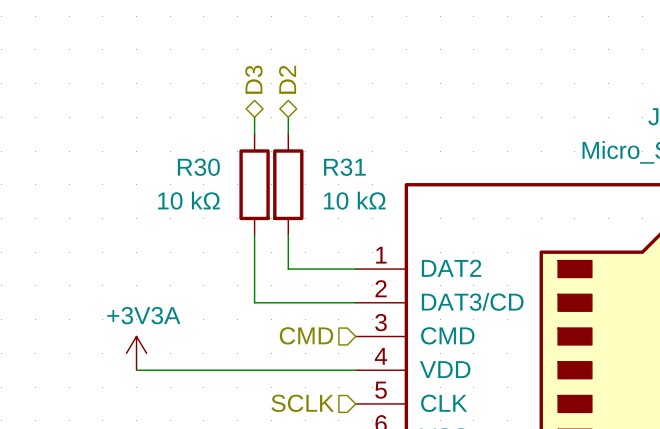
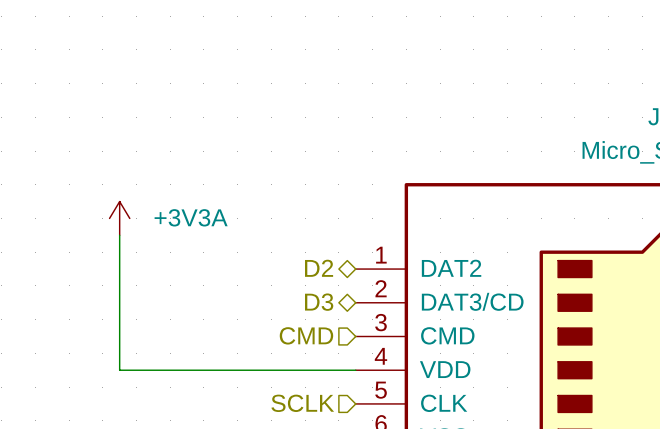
hierarchical label rotation: 0° (253, 79) -> 90° counterclockwise (319, 302)
hierarchical label position: D3 (253, 79) -> D3 (319, 302)
hierarchical label rotation: 0° (287, 79) -> 90° counterclockwise (319, 268)
hierarchical label position: D2 (287, 79) -> D2 (319, 268)
wire: (254, 117) (254, 134) -> none
wire: (288, 117) (288, 134) -> none
R30: 10 kΩ (254, 184) -> none
R31: 10 kΩ (288, 184) -> none
wire: none -> (119, 235) (119, 370) (136, 370)
wire: (254, 235) (254, 302) (355, 302) -> none
wire: (288, 235) (288, 269) (355, 269) -> none
power symbol text position: +3V3A (143, 315) -> +3V3A (191, 217)
power symbol position: +3V3A (136, 353) -> +3V3A (119, 218)

